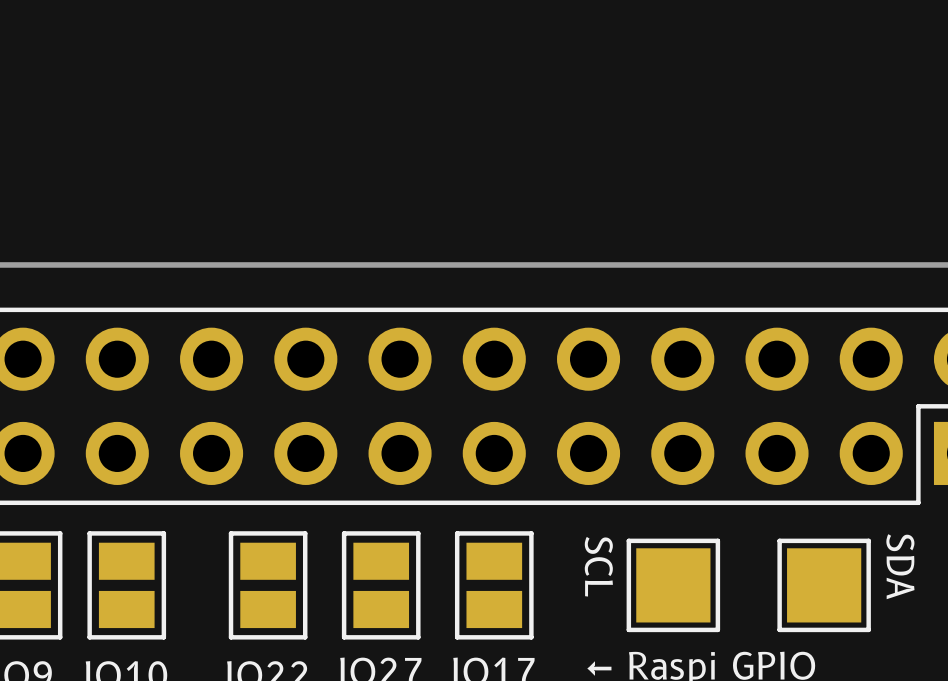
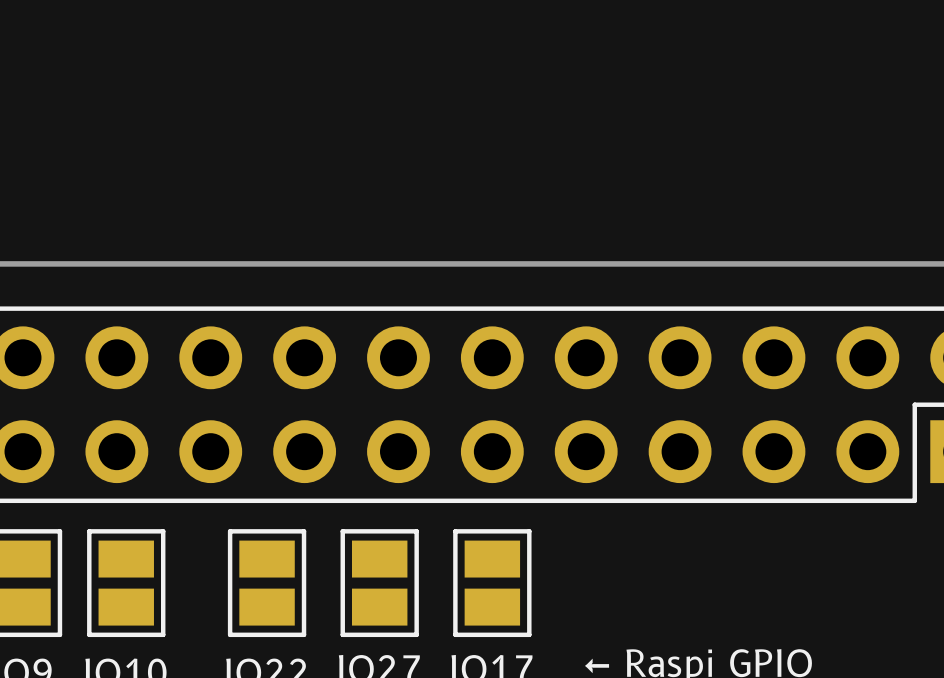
text: SCL (598, 566) -> none
text: SDA (900, 566) -> none
part: (673, 585) -> none
part: (824, 585) -> none

